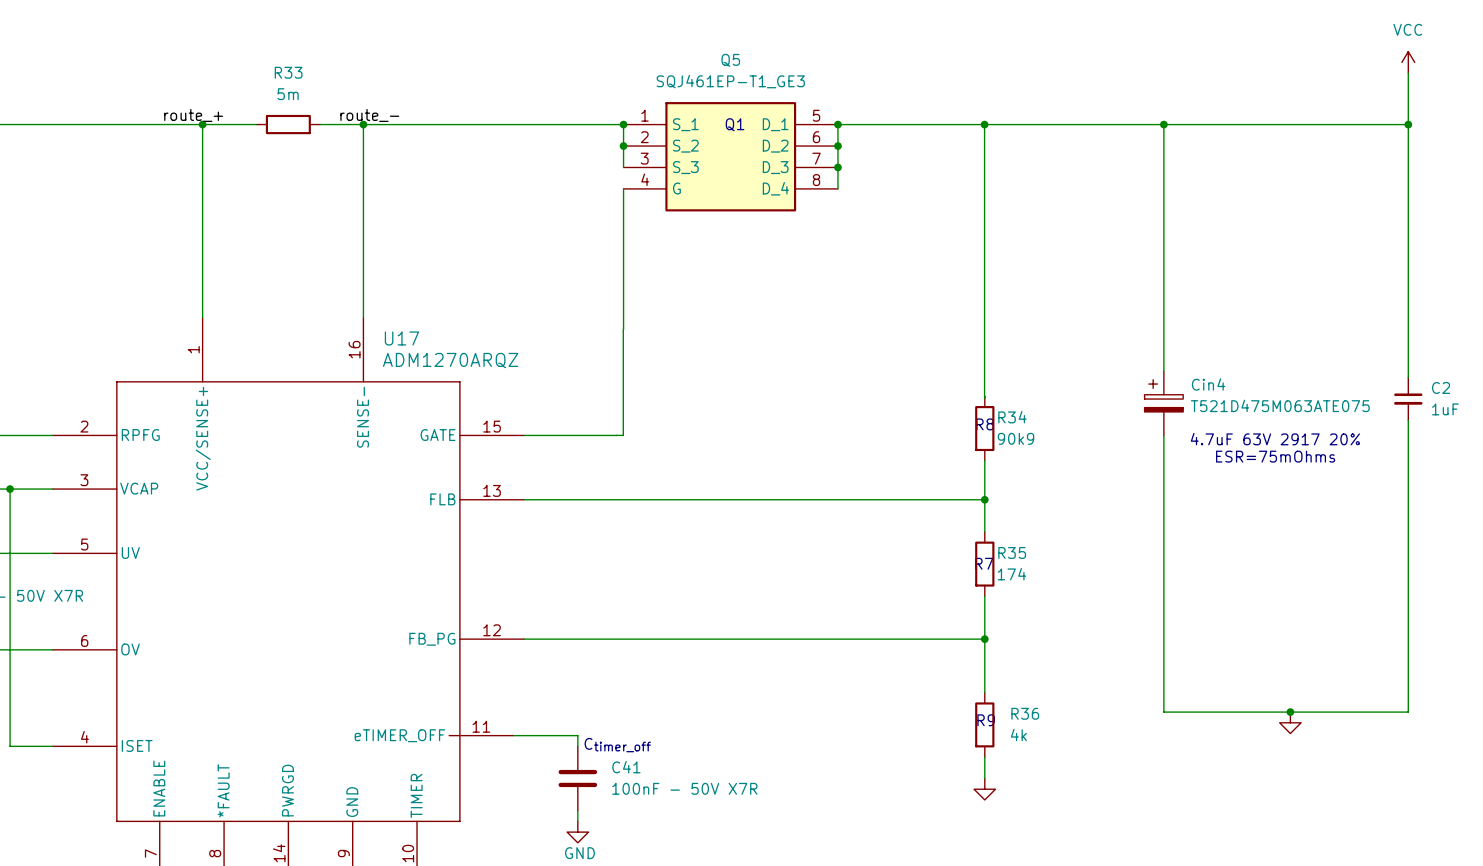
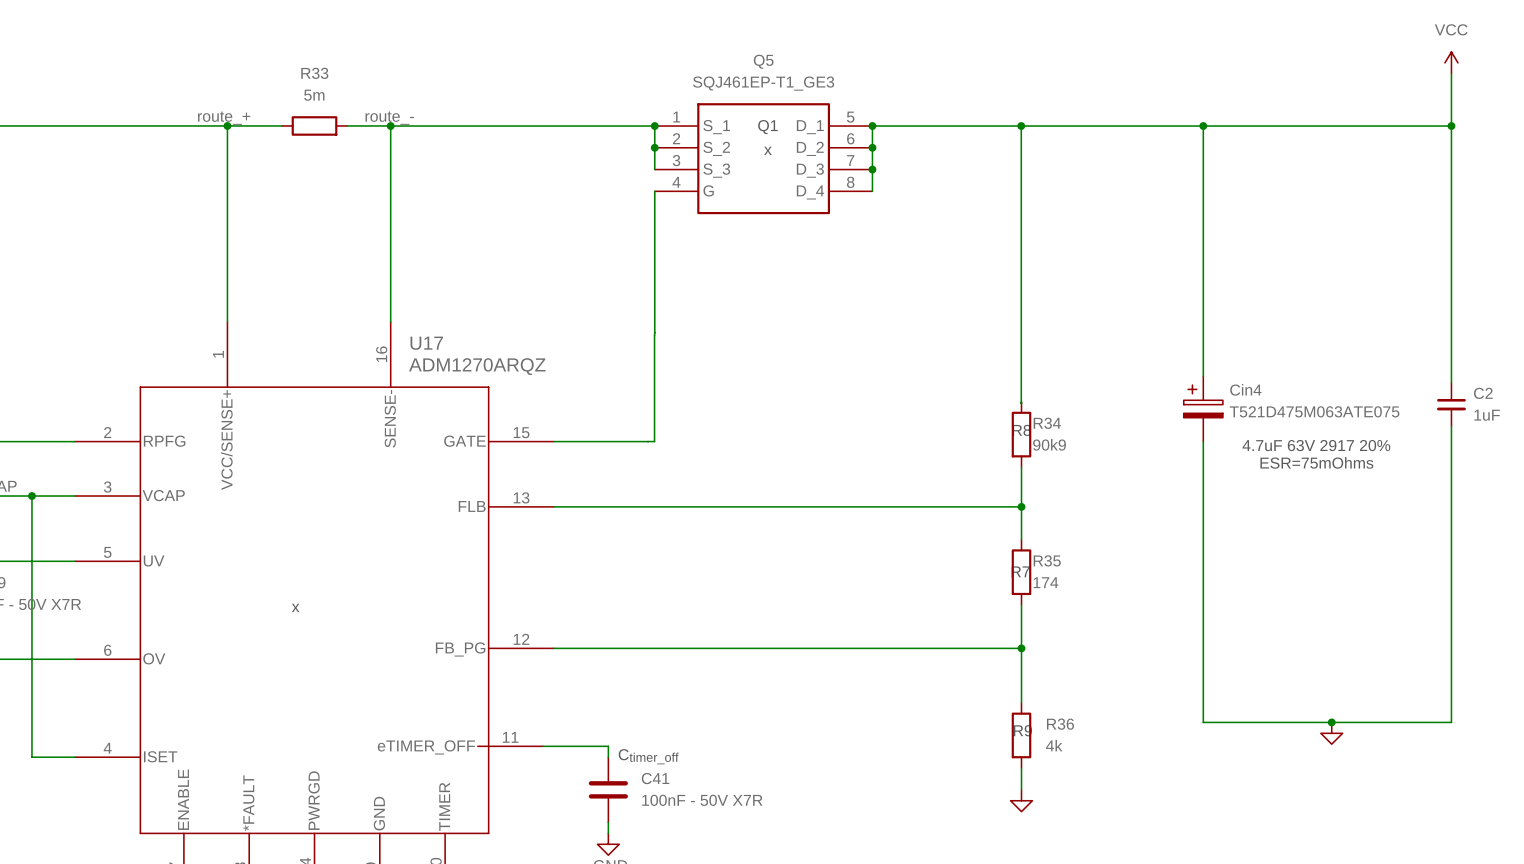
text: none -> x (767, 150)
text: none -> x (295, 607)

